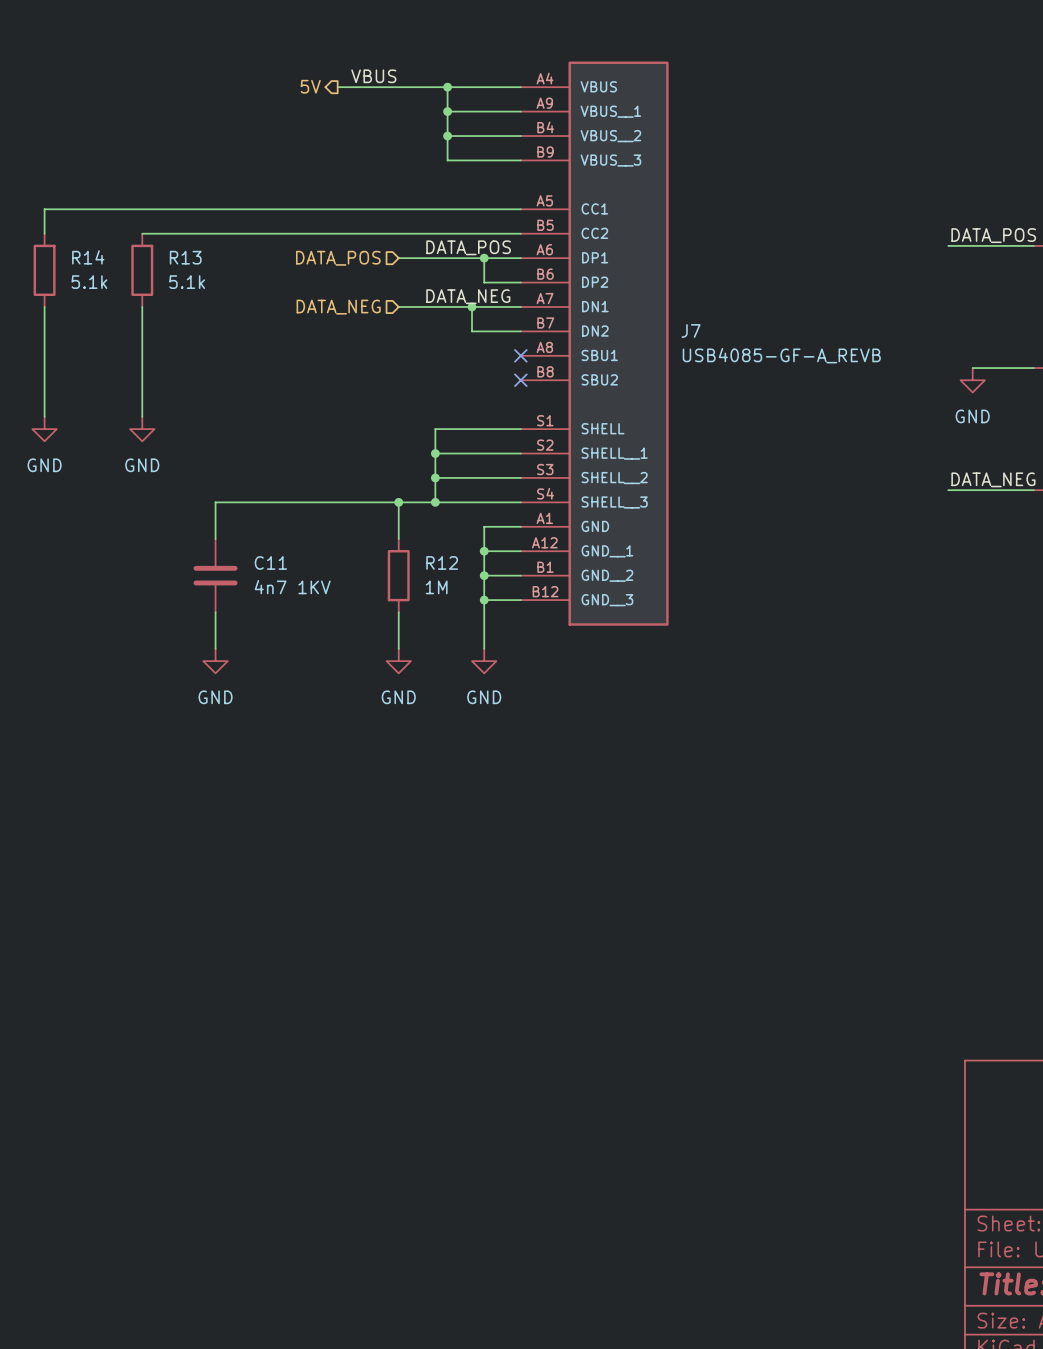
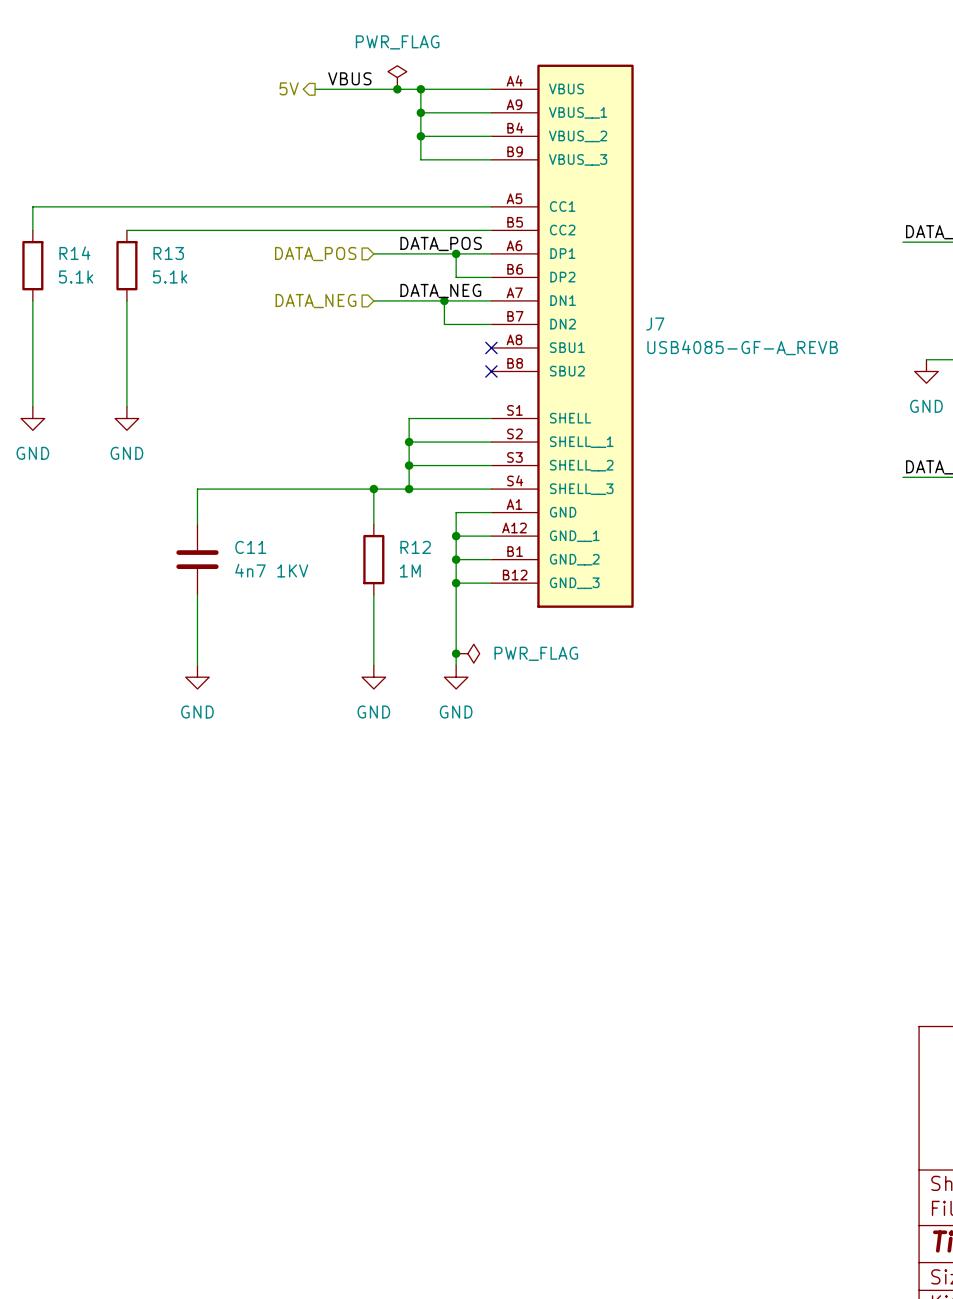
power symbol: none -> PWR_FLAG (397, 77)
junction: none -> (397, 89)
wire: none -> (197, 630) (197, 665)
wire: none -> (373, 630) (373, 665)
wire: none -> (456, 630) (456, 665)
power symbol position: GND (215, 661) -> GND (197, 677)
power symbol position: GND (398, 661) -> GND (373, 677)
power symbol position: GND (484, 661) -> GND (456, 677)
junction: none -> (456, 653)
power symbol: none -> PWR_FLAG (467, 653)

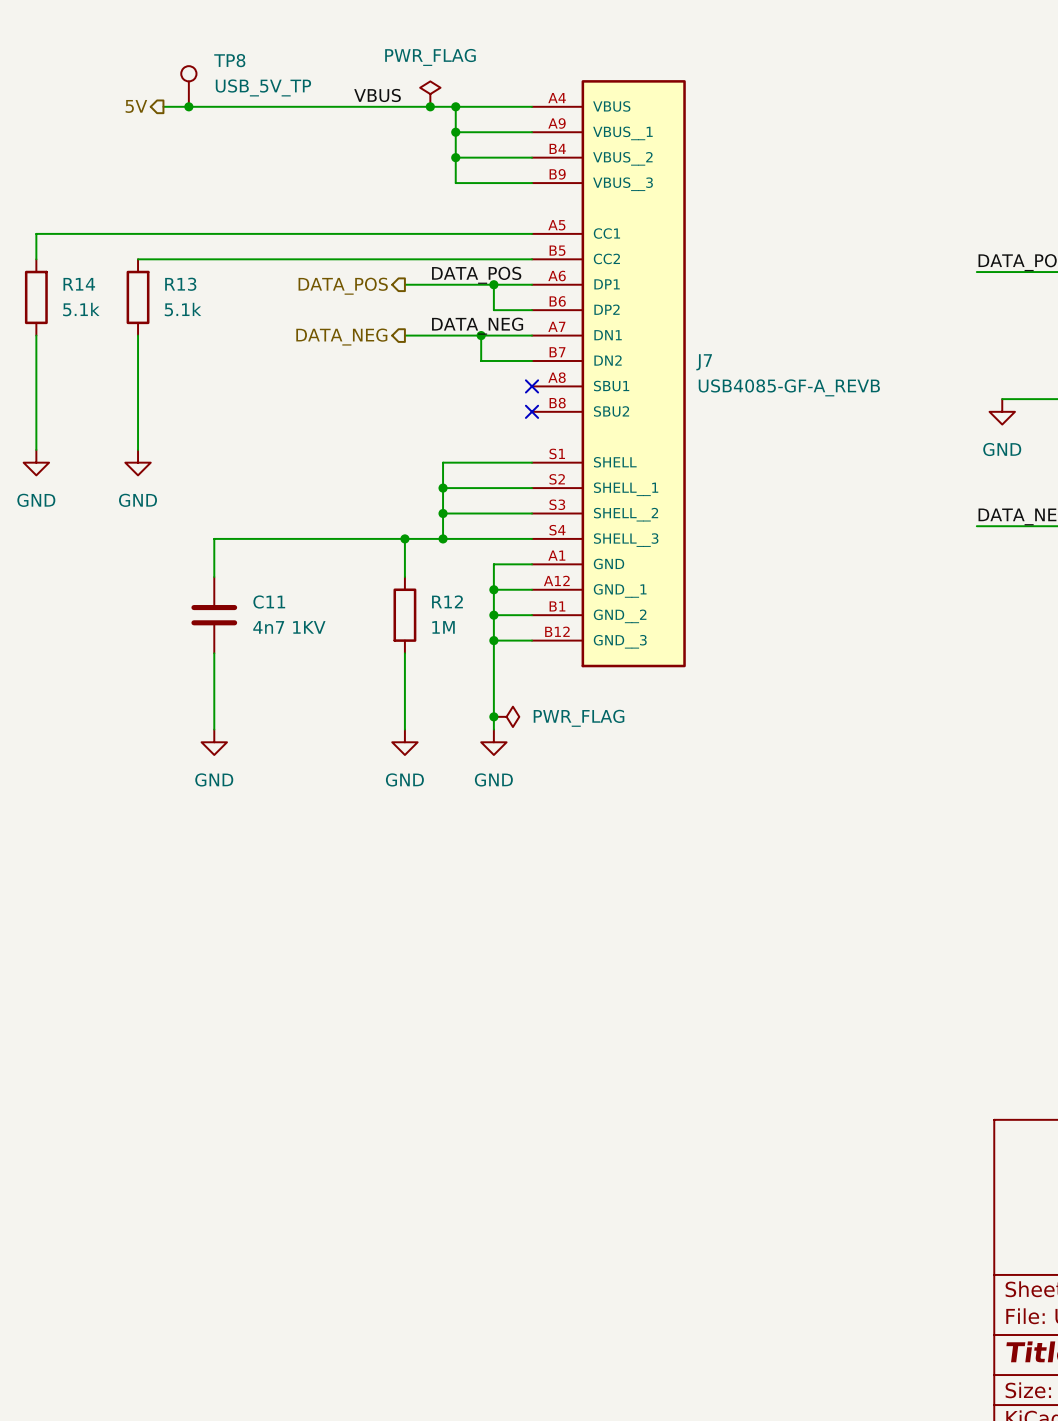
TP8: none -> USB_5V_TP (188, 86)
hierarchical label position: 5V (289, 88) -> 5V (136, 106)
wire: none -> (163, 106) (341, 106)
junction: none -> (188, 106)
hierarchical label shape: input (315, 254) -> output (343, 286)
hierarchical label shape: input (315, 301) -> output (341, 337)

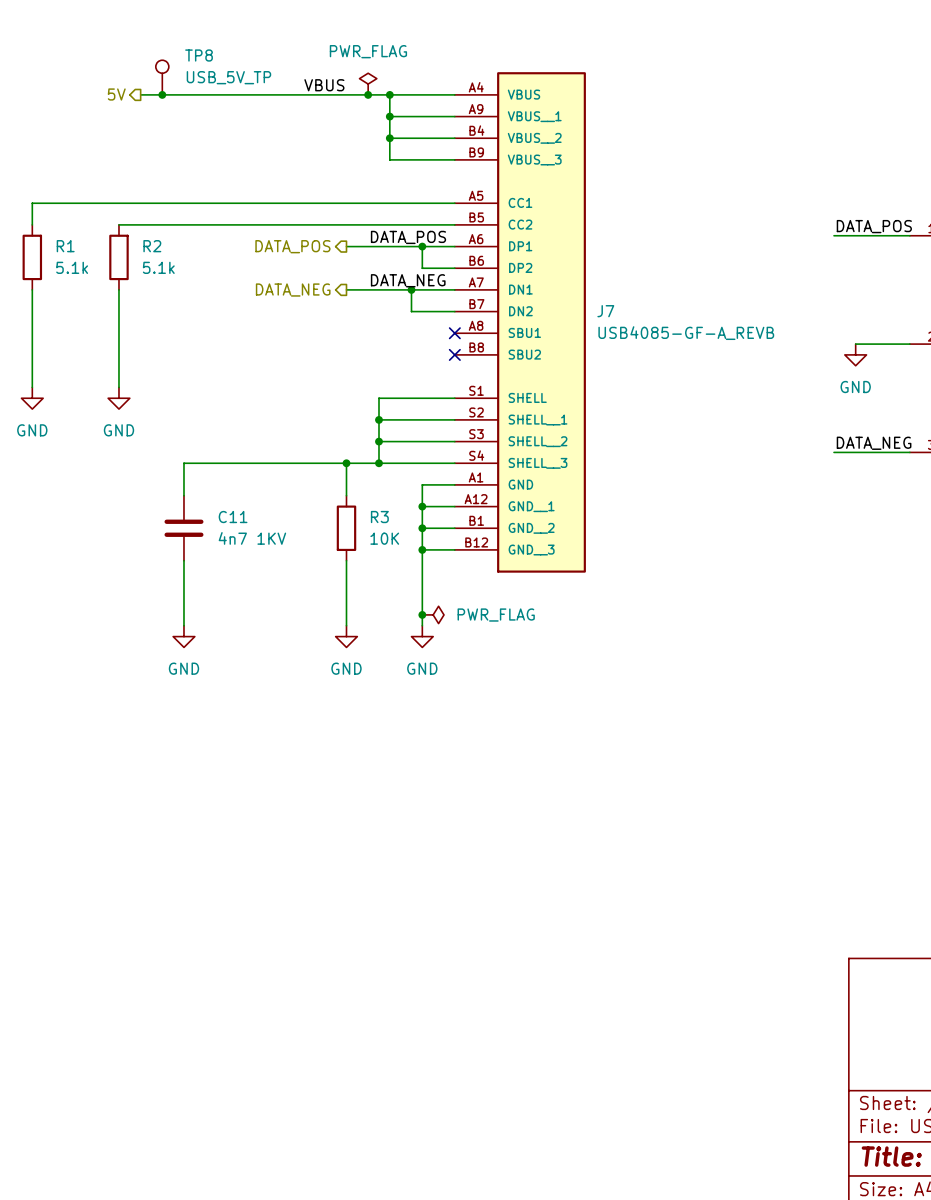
R14 name: R14 (79, 284) -> R1 (65, 246)
R13 name: R13 (180, 284) -> R2 (152, 246)
R12 name: R12 (447, 601) -> R3 (379, 517)
R12 value: 1M (443, 627) -> 10K (384, 538)

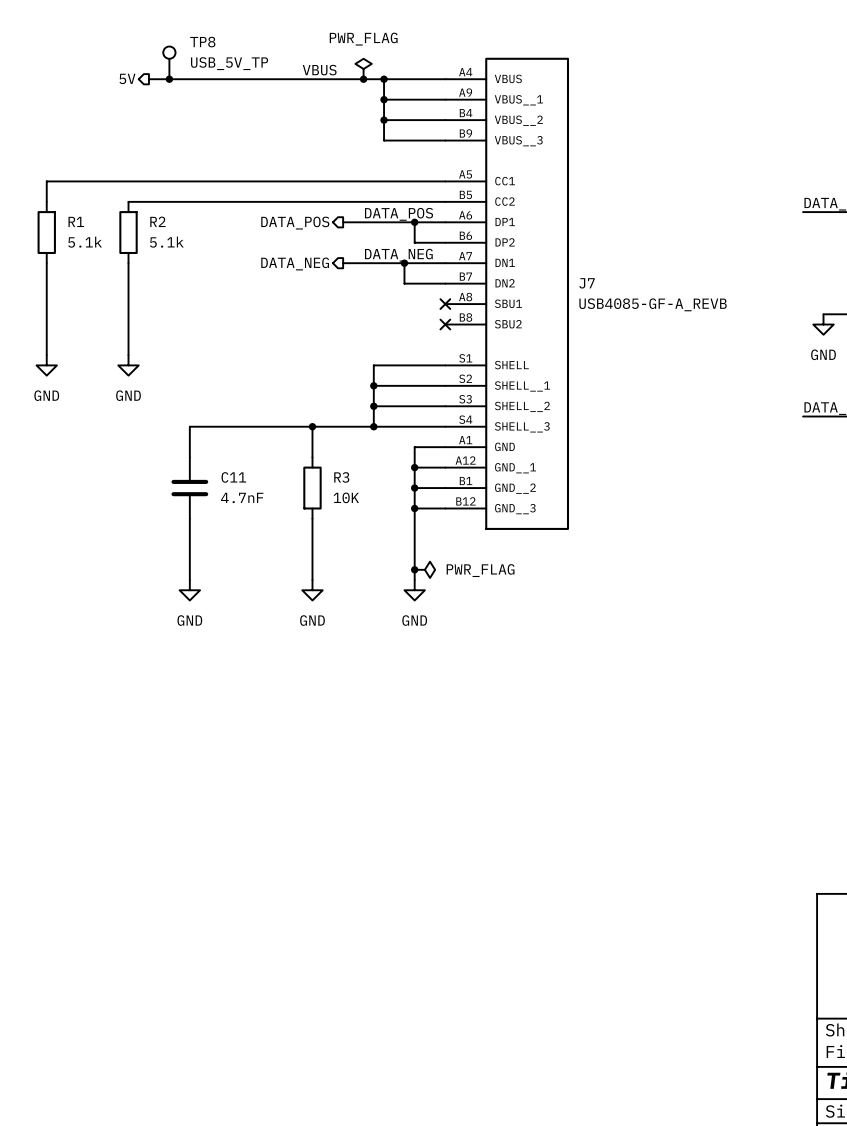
wire: (346, 463) (346, 495) -> (312, 426) (312, 457)
junction position: (346, 463) -> (312, 426)
R3 position: (346, 528) -> (312, 488)
C11 value: 4n7 1KV (252, 538) -> 4.7nF (242, 497)
wire: (346, 560) (346, 625) -> (312, 518) (312, 580)
power symbol position: GND (346, 636) -> GND (312, 590)

